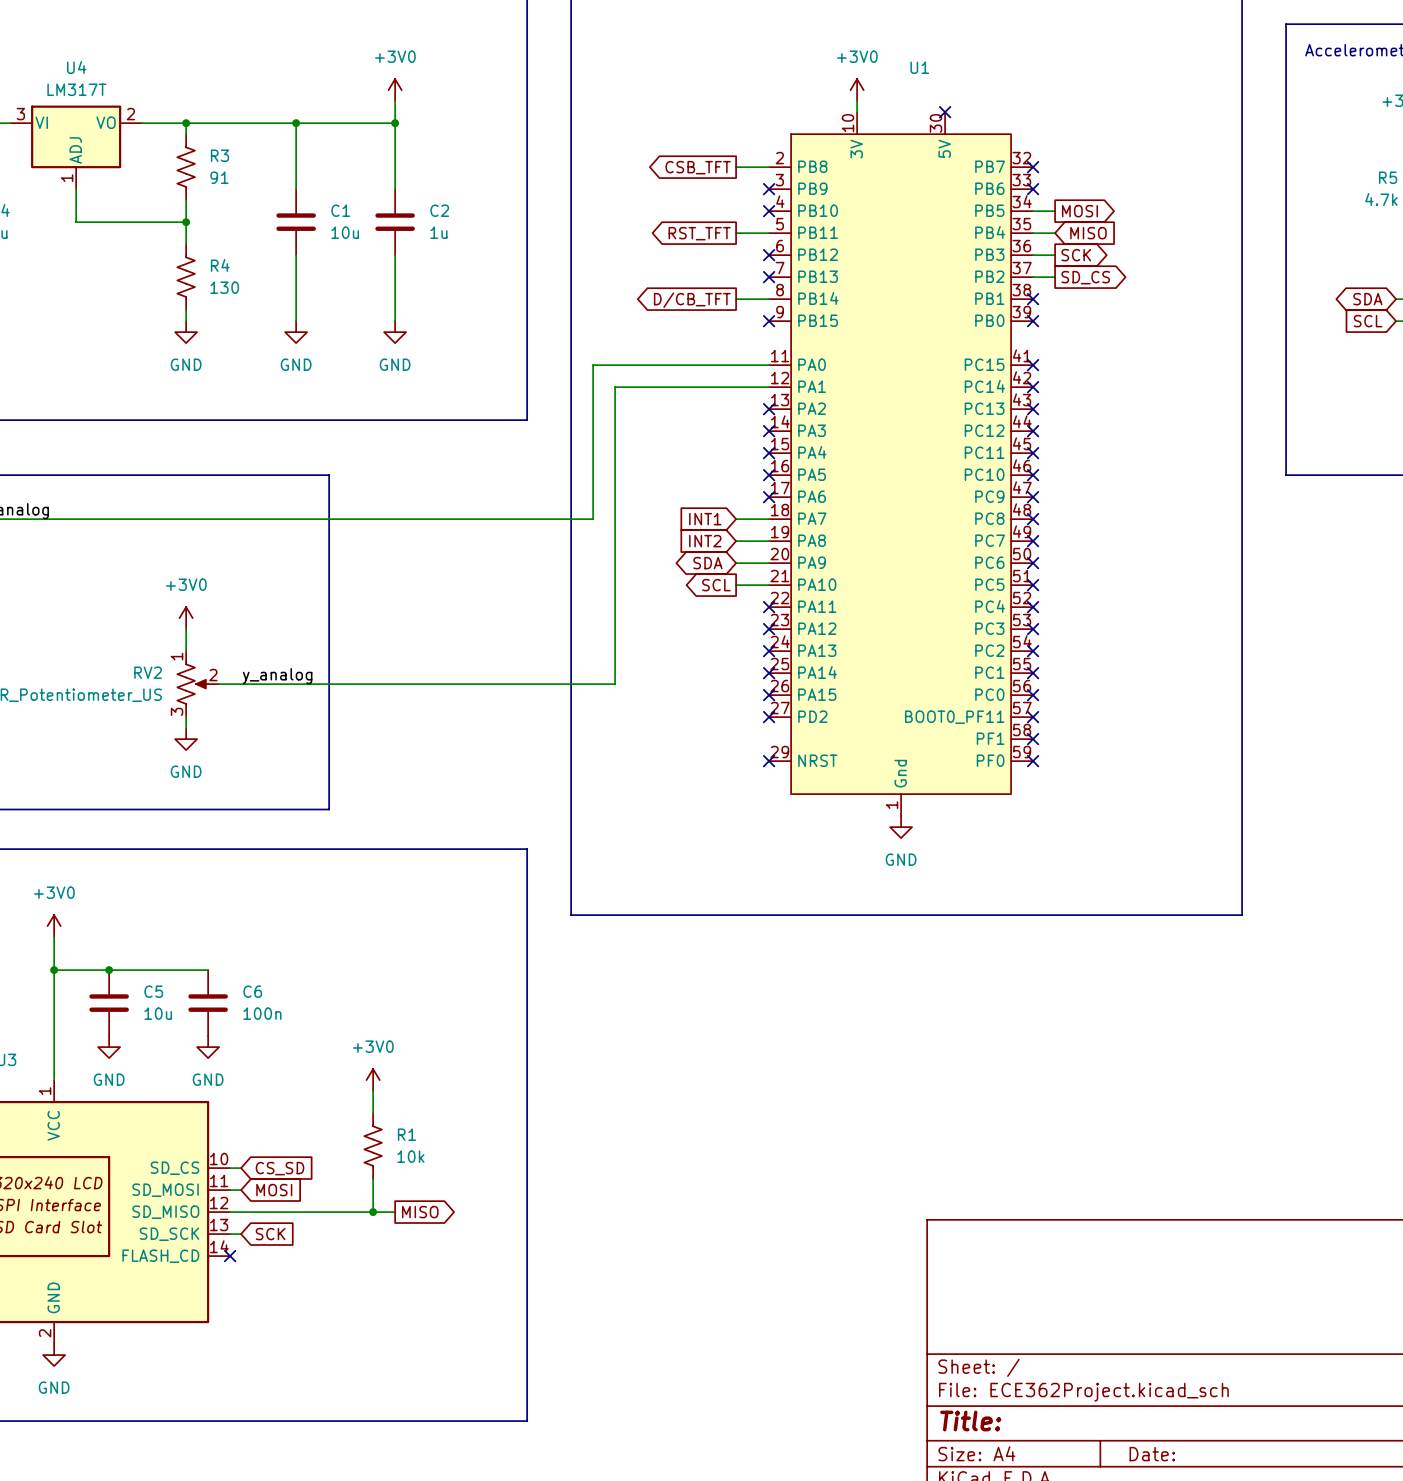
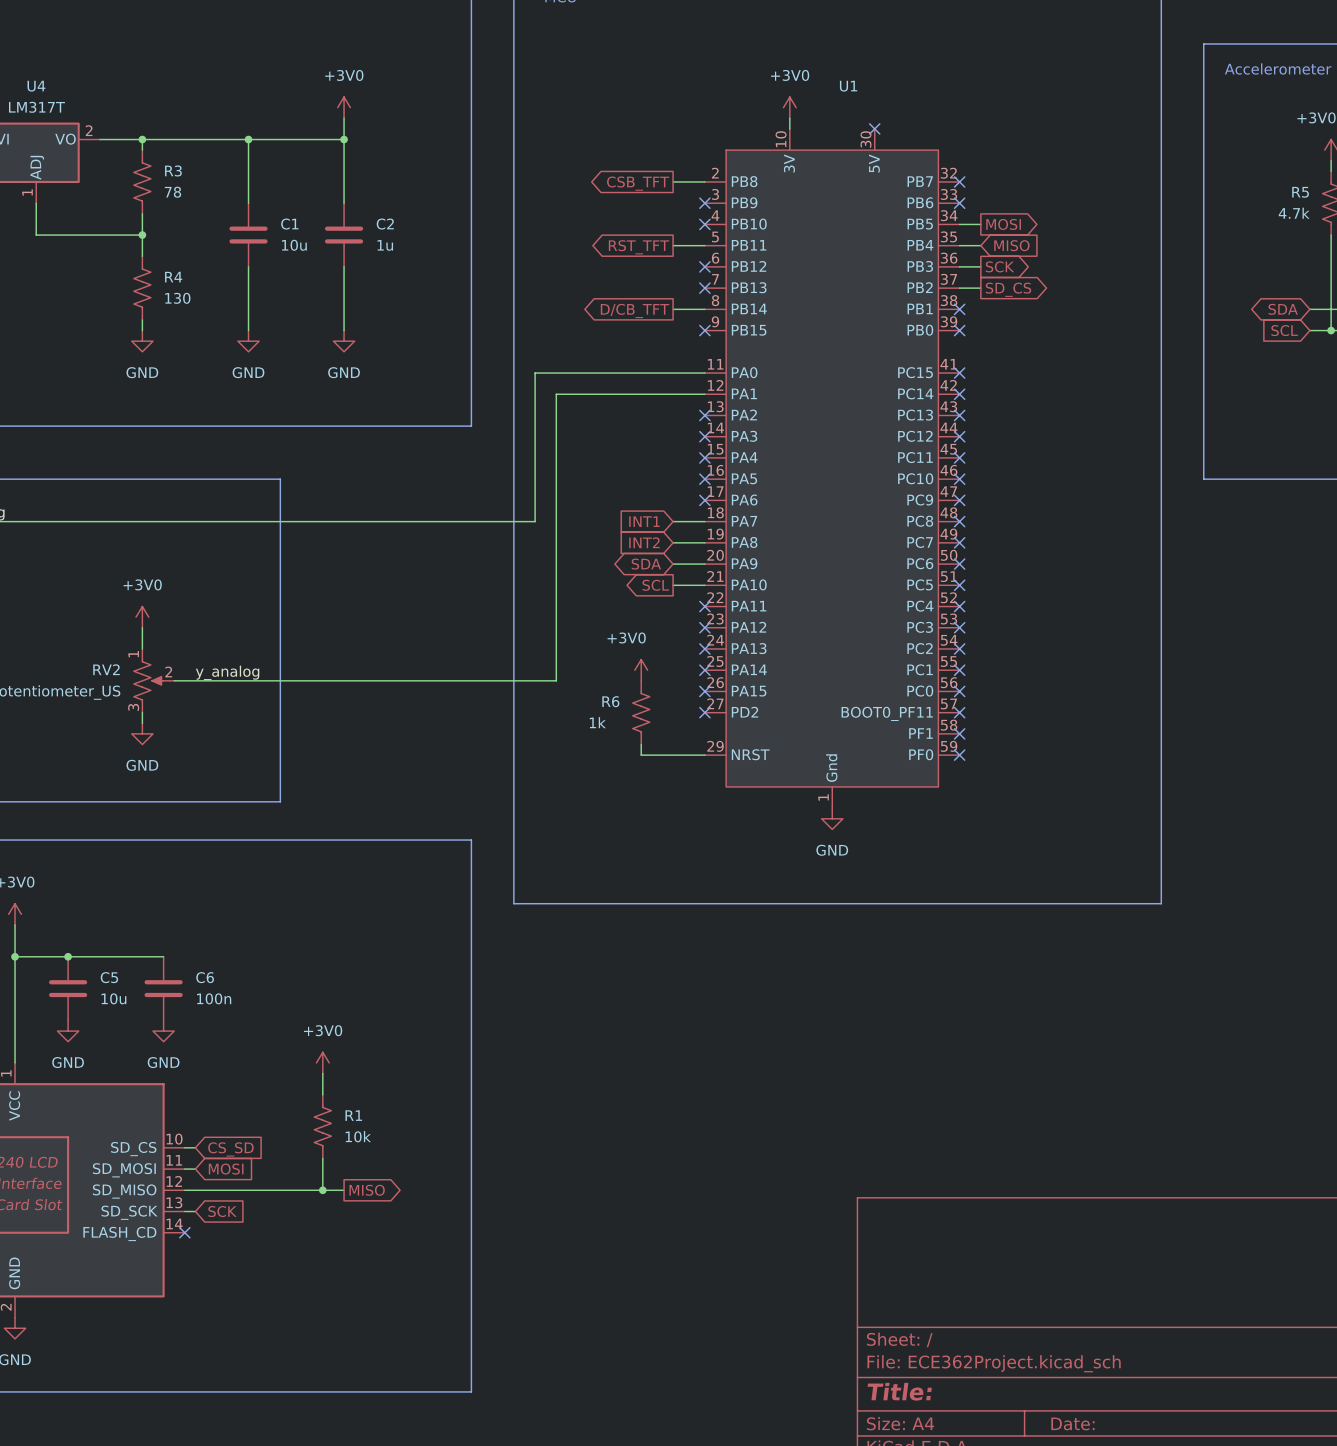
R3 value: 91 (219, 177) -> 78 (172, 192)
power symbol: none -> +3V0 (641, 670)
R6: none -> 1k (641, 712)
wire: none -> (641, 744) (641, 755) (704, 755)
no-connect mark: (769, 761) -> none

